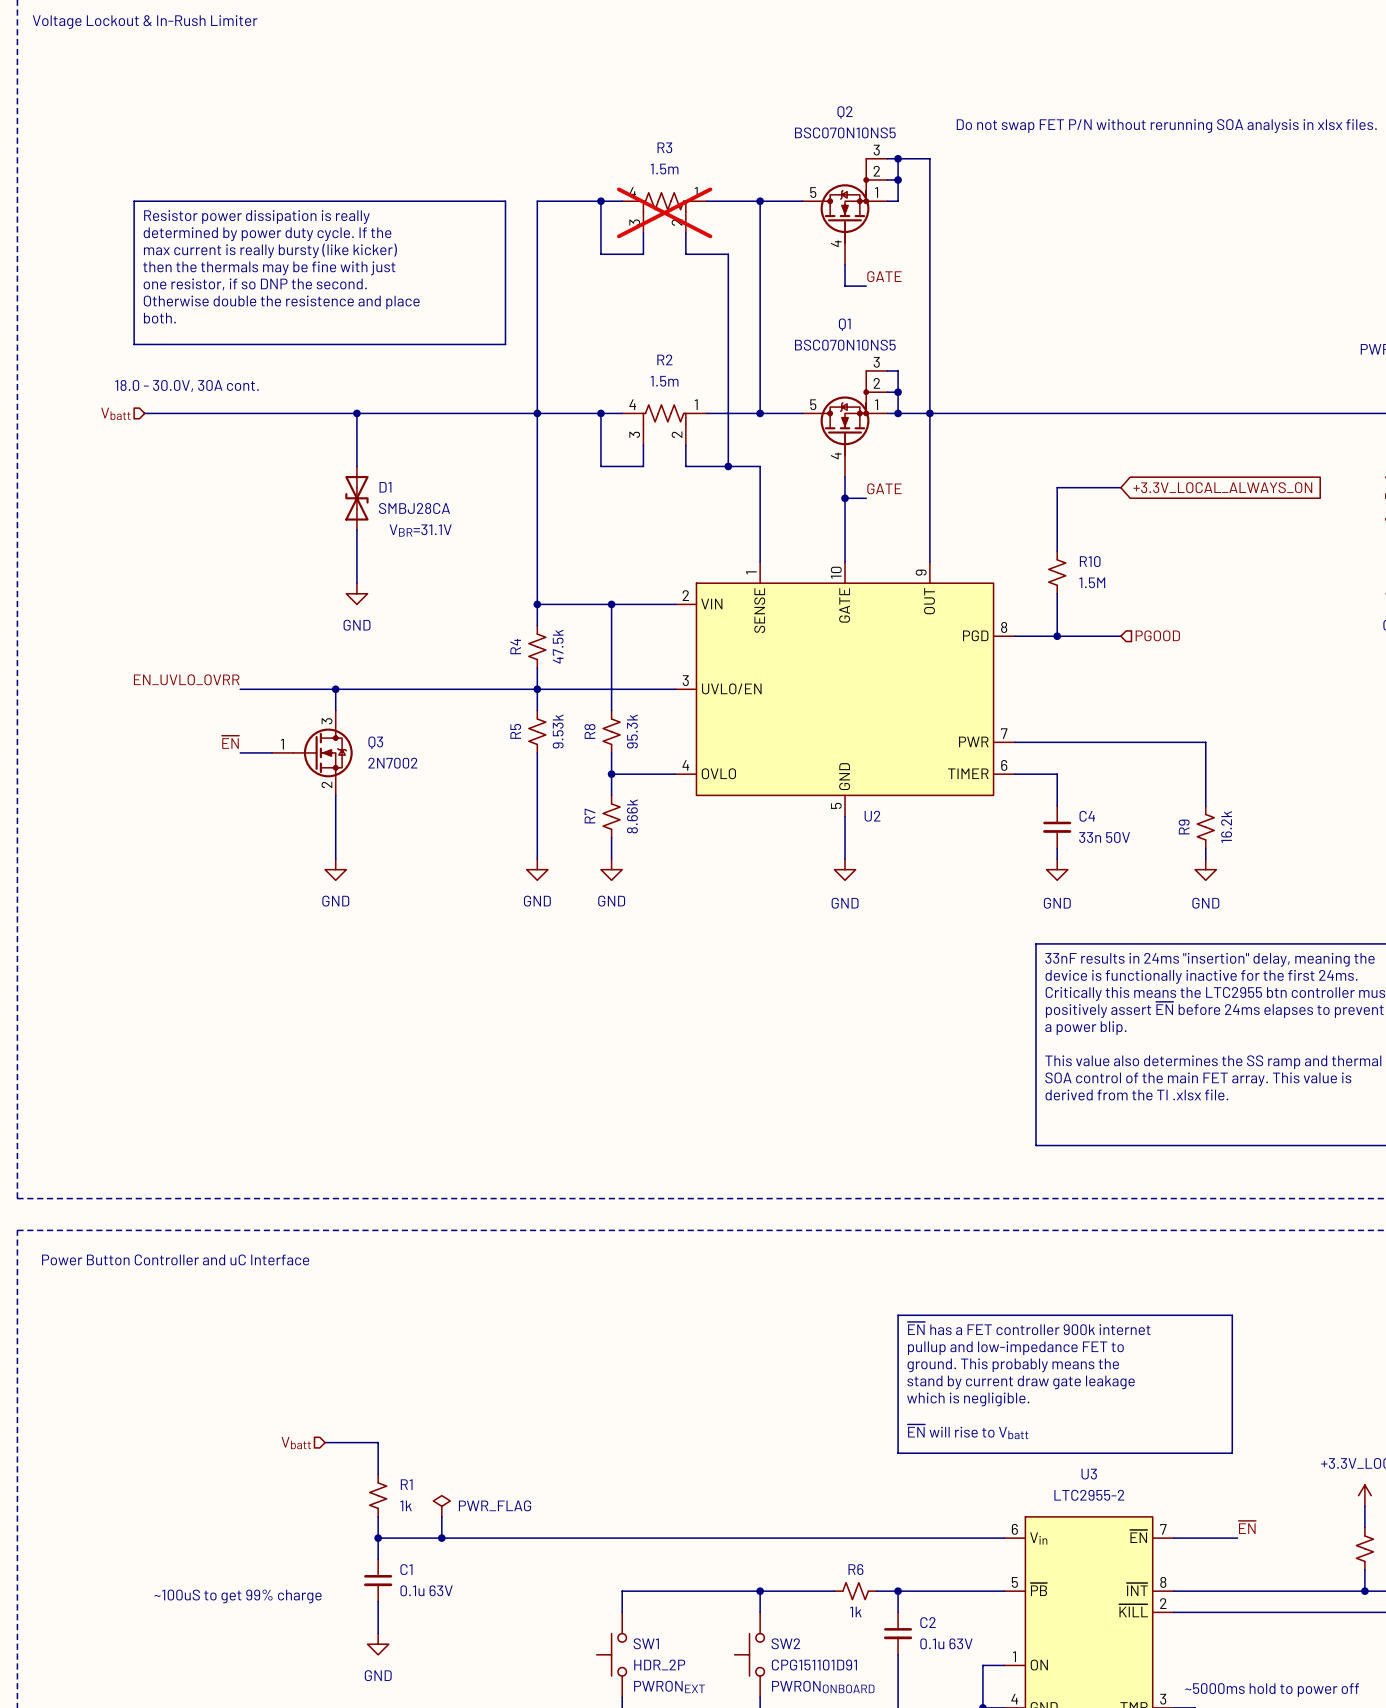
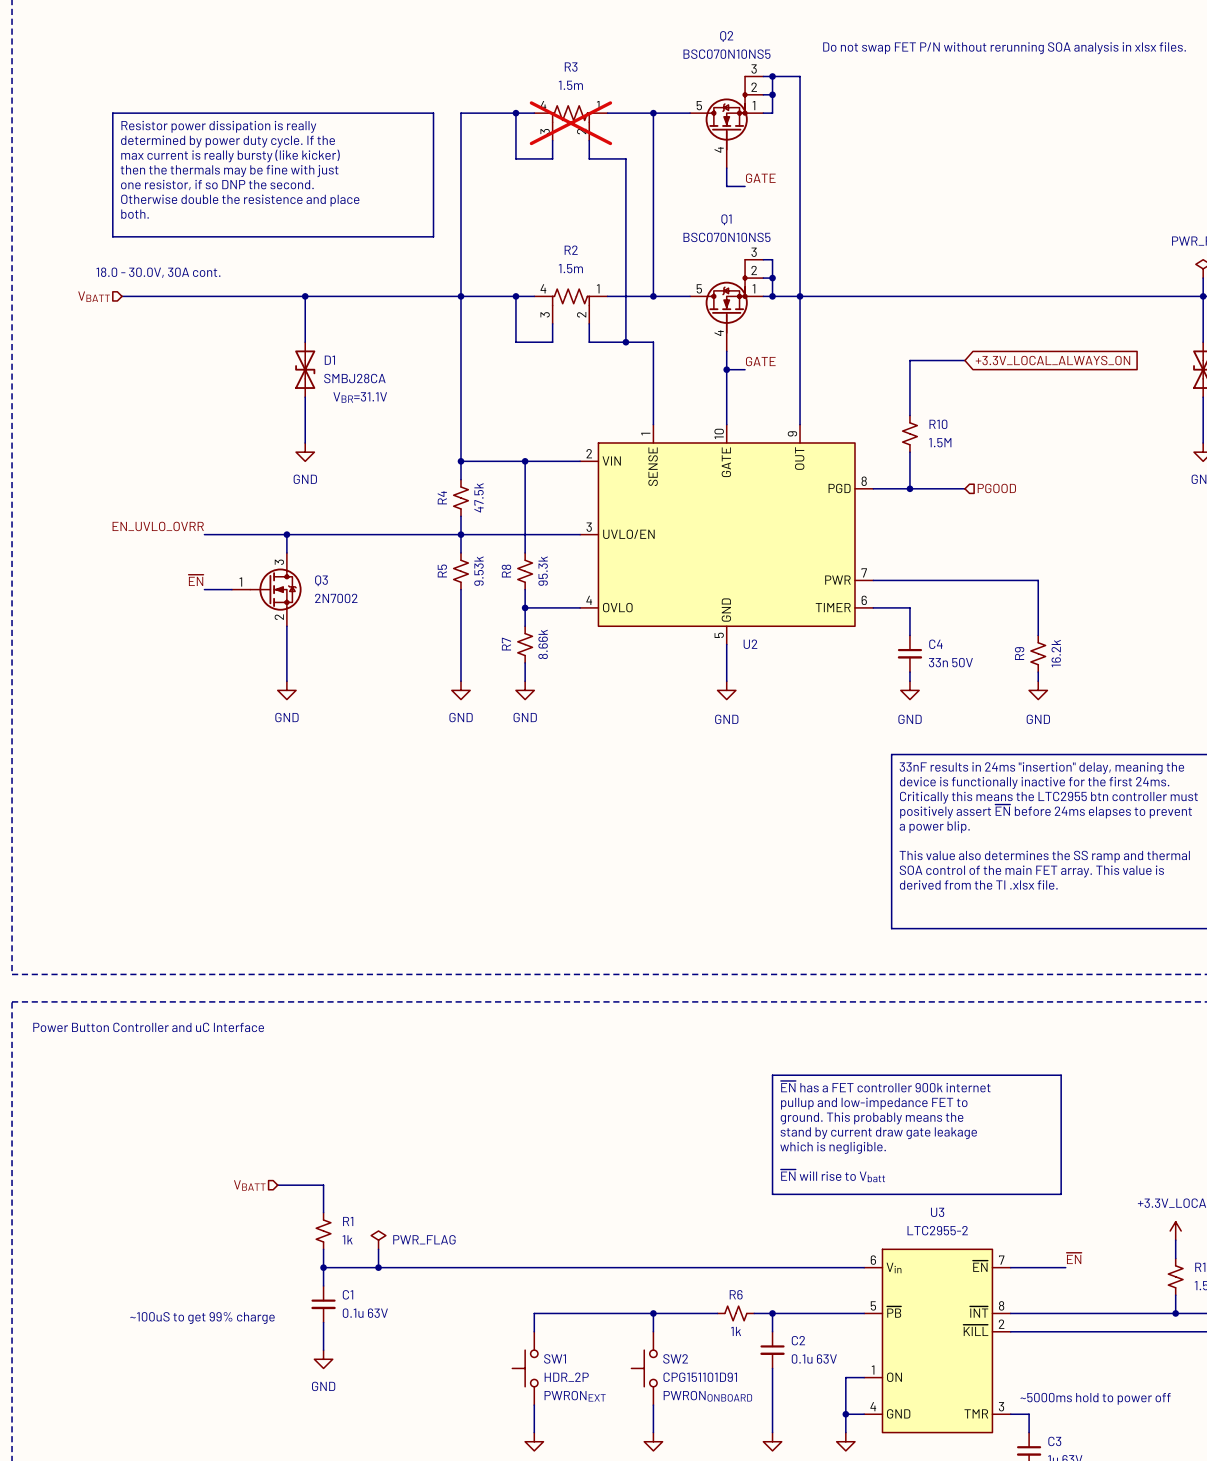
hierarchical label: Vbatt (115, 413) -> VBATT (94, 296)
hierarchical label: Vbatt (296, 1443) -> VBATT (249, 1185)

